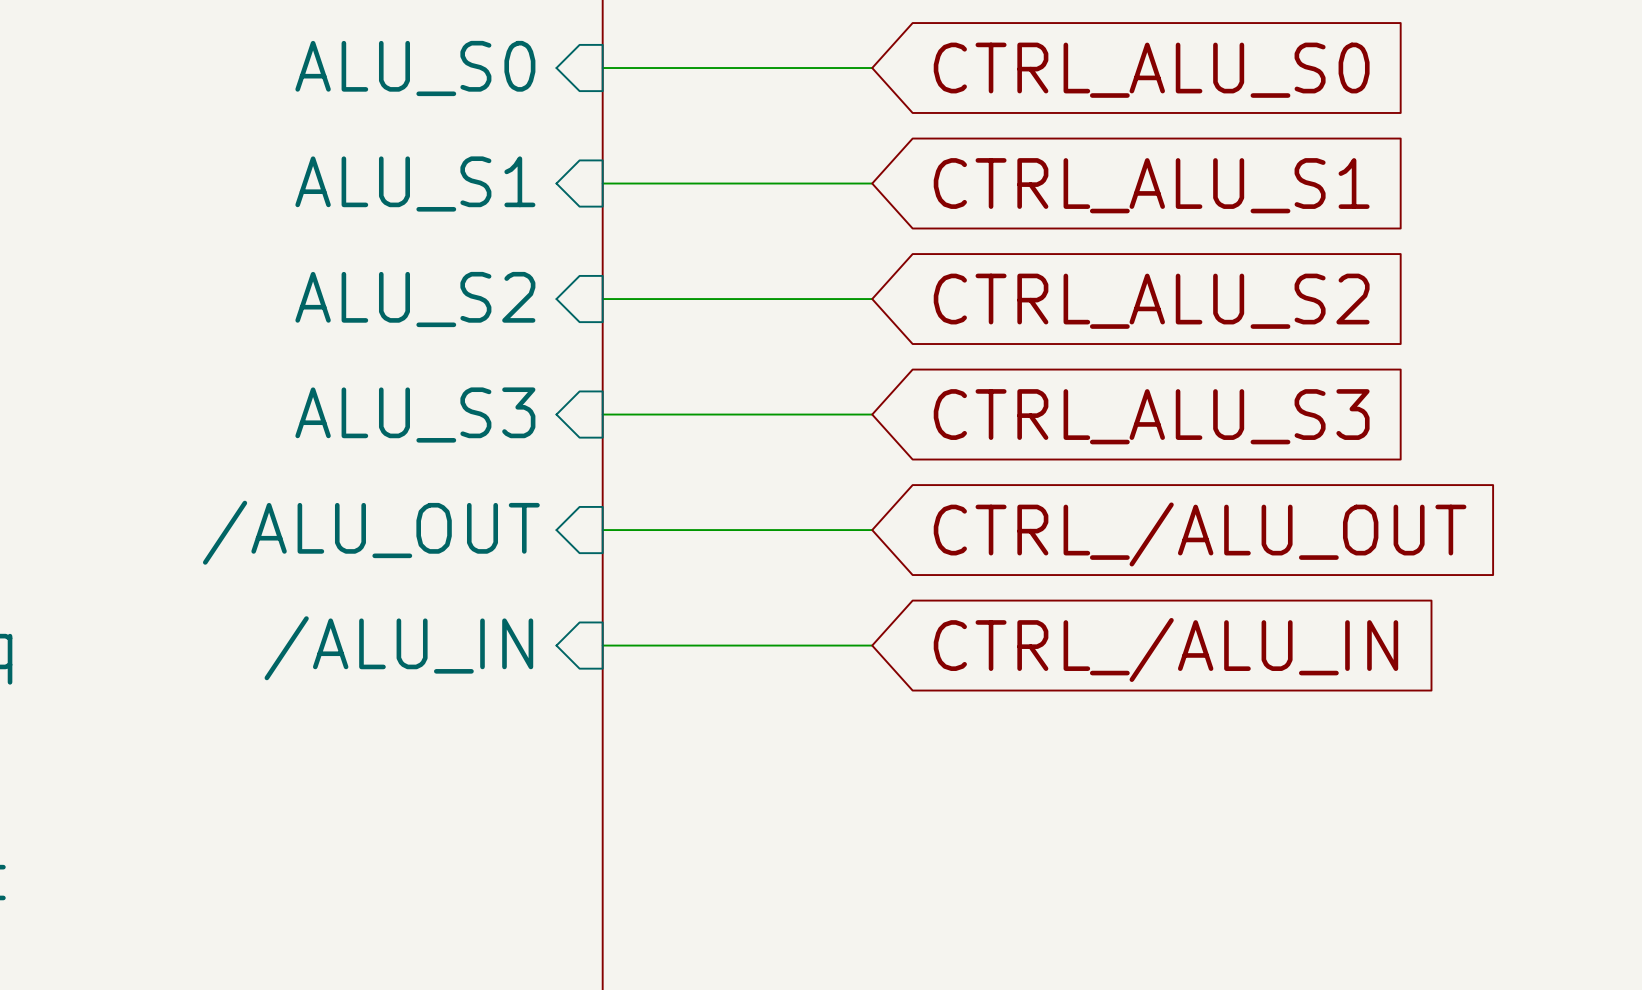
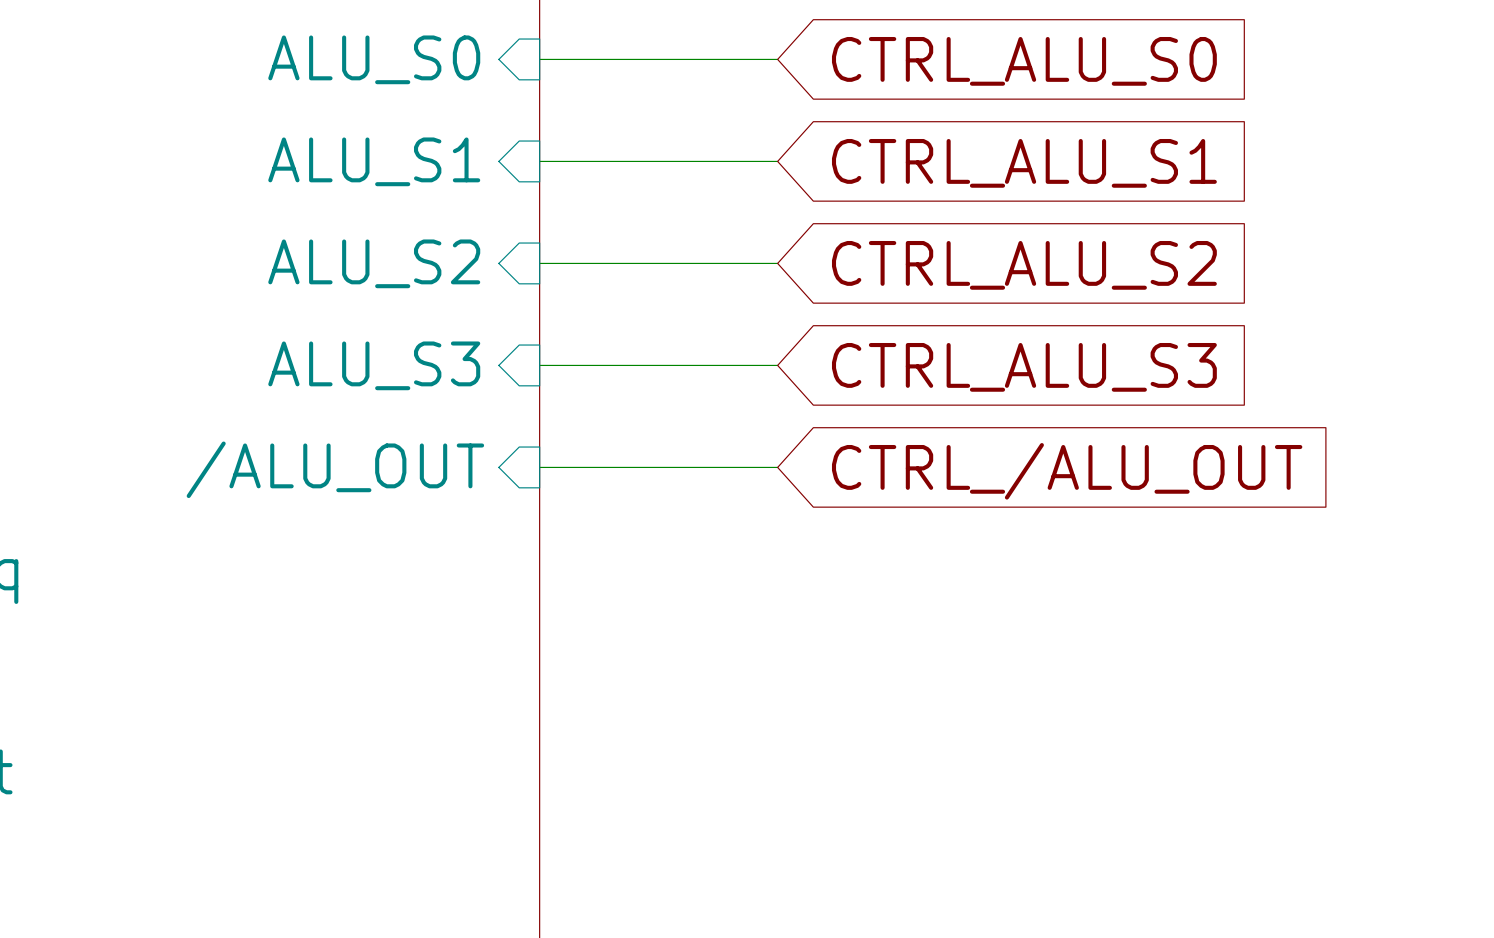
wire: (602, 645) (872, 645) -> none
sheet pin: /ALU_IN (398, 648) -> none
global label: CTRL_/ALU_IN (1165, 649) -> none

